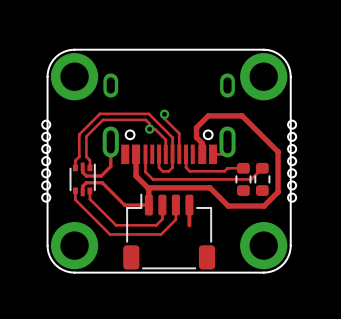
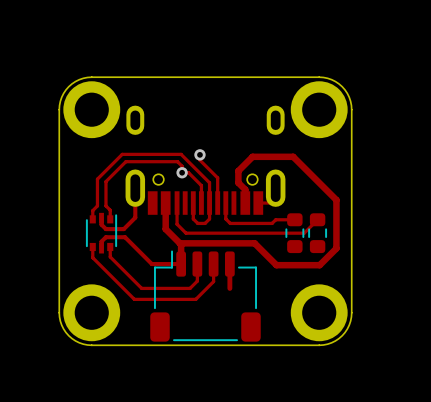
part: (46, 161) -> none
part: (292, 161) -> none

